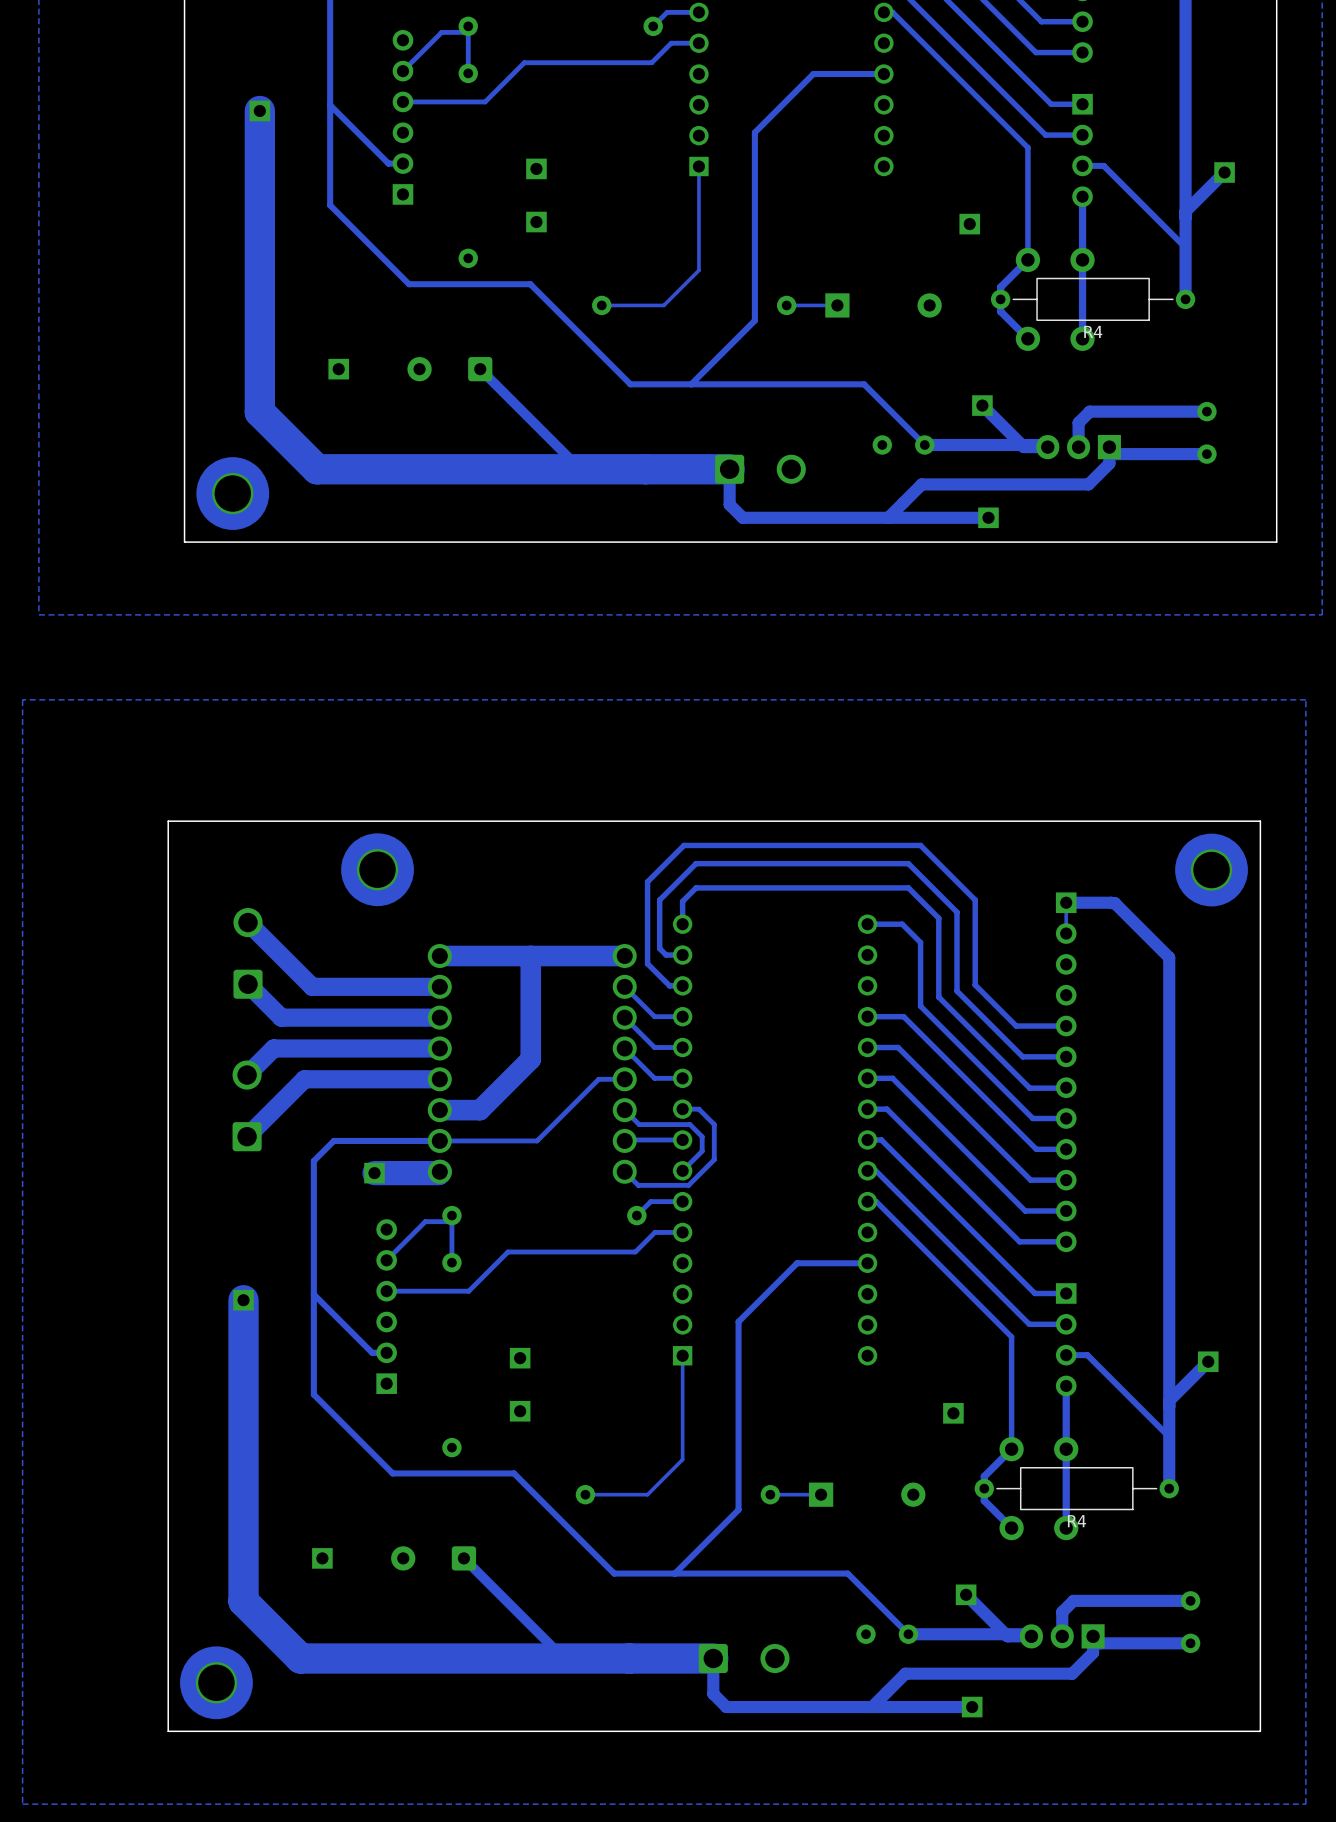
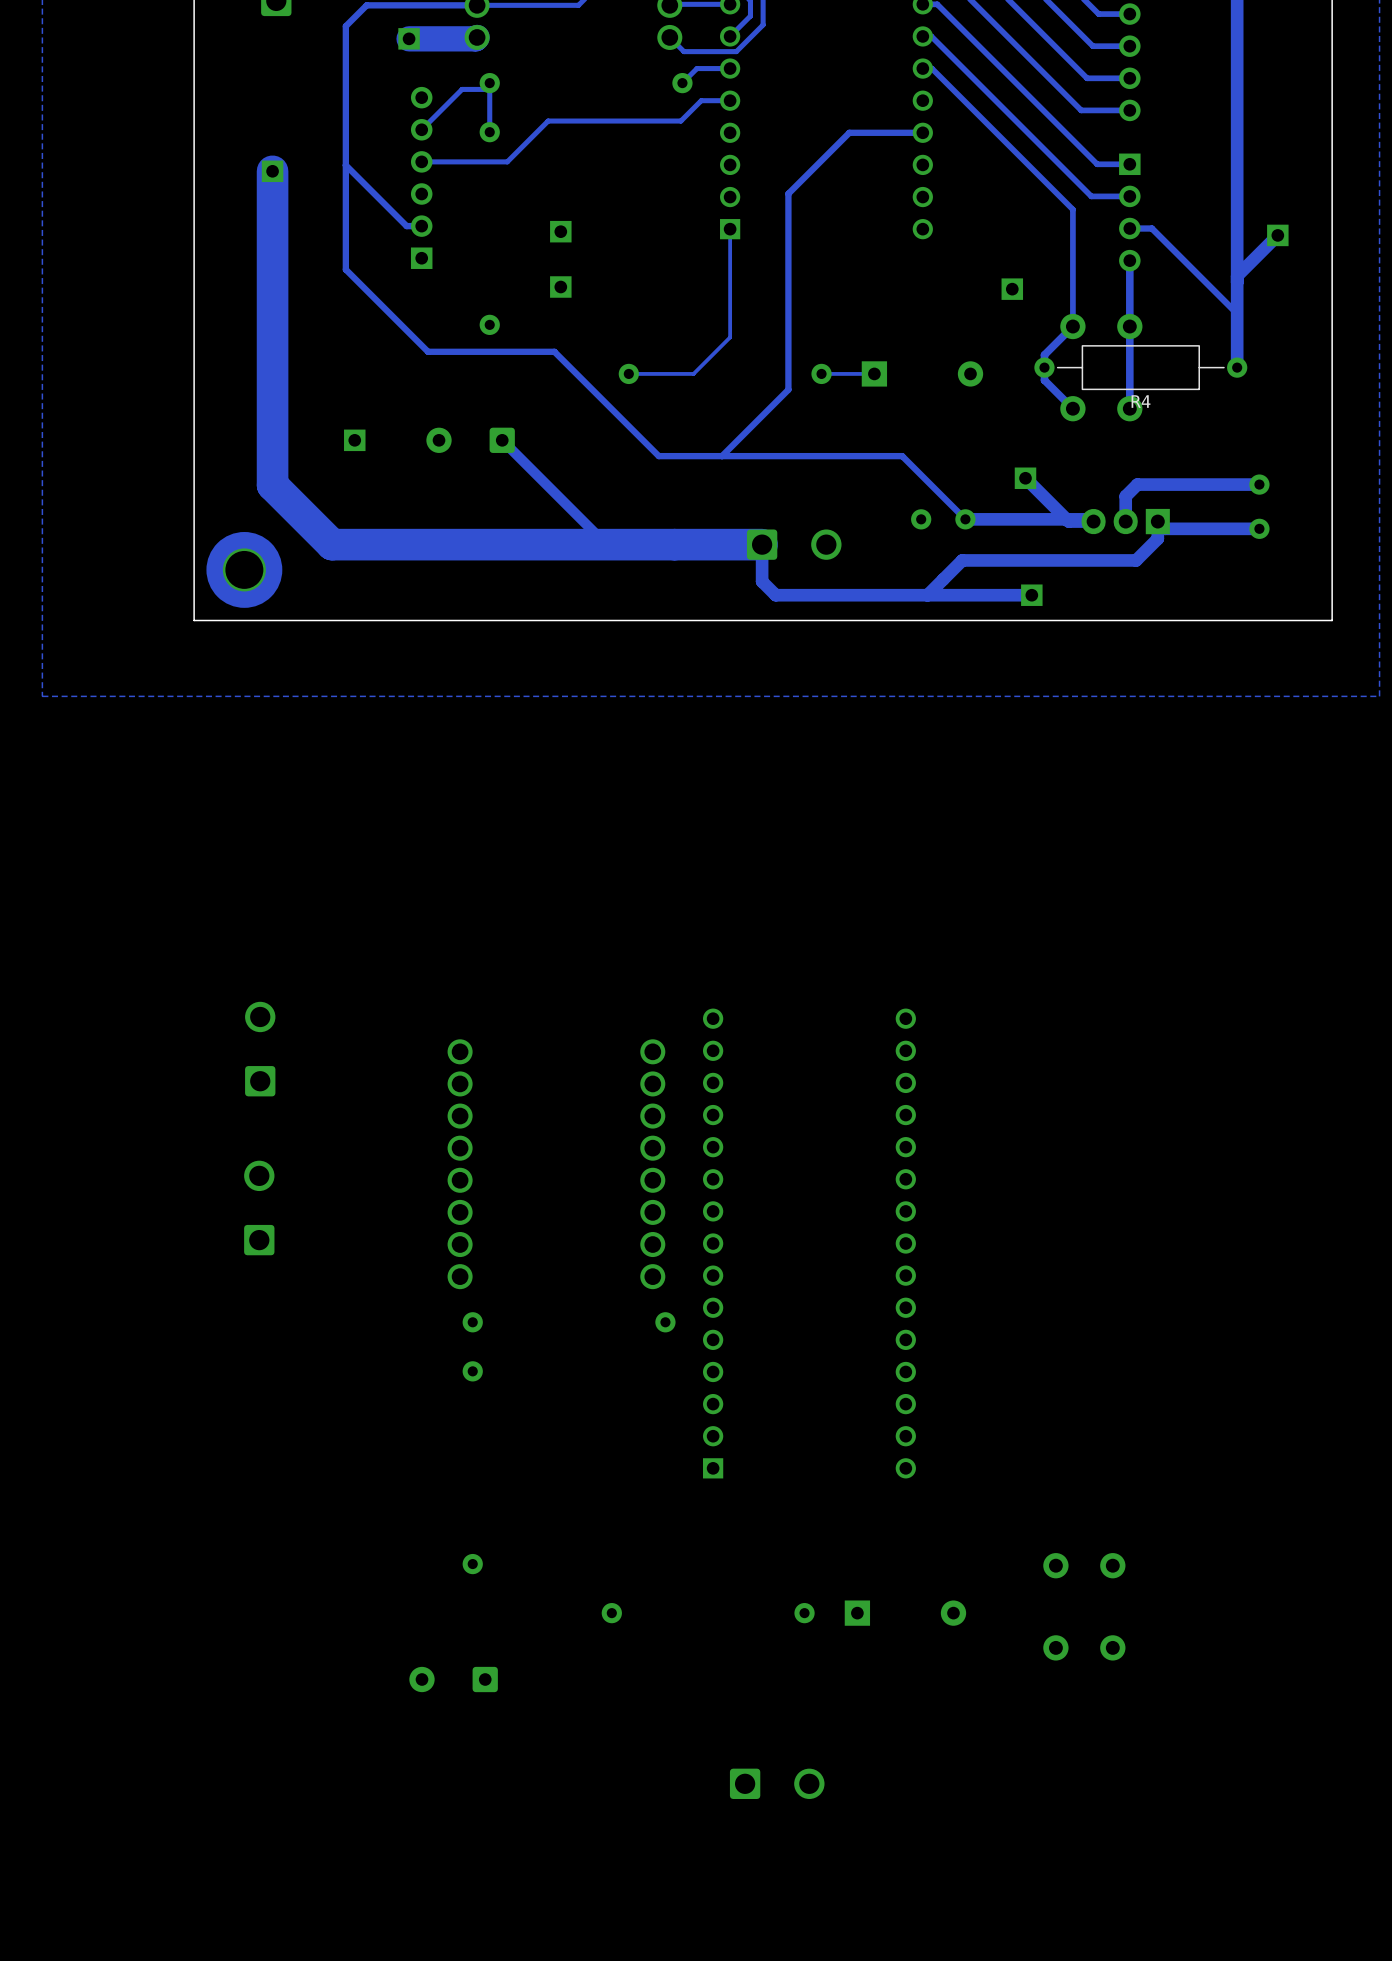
zone outline: (1305, 699) (22, 699) (22, 1804) (1305, 1804) (1305, 699) -> none
board edge: (1260, 821) (168, 821) (168, 1731) (1260, 1731) (1260, 821) -> none
part: (377, 869) -> none
part: (1211, 870) -> none
track: (248, 922) (312, 986) (439, 986) -> none
track: (682, 924) (682, 901) (696, 887) (908, 887) (938, 918) (938, 997) (1029, 1088) (1066, 1087) -> none
track: (867, 924) (902, 924) (920, 942) (920, 1006) (1032, 1118) (1066, 1118) -> none
track: (1066, 933) (1066, 902) (1114, 903) (1169, 957) (1169, 1488) (1169, 1436) (1087, 1355) (1066, 1355) -> none
track: (682, 955) (666, 955) (659, 948) (659, 900) (696, 863) (908, 863) (957, 912) (957, 991) (1022, 1056) (1066, 1056) -> none
track: (530, 956) (530, 1059) (479, 1110) (439, 1110) -> none
track: (624, 956) (439, 956) -> none
track: (248, 984) (281, 1017) (439, 1017) -> none
track: (682, 985) (669, 985) (647, 963) (647, 881) (683, 845) (920, 845) (975, 900) (975, 985) (1016, 1026) (1066, 1026) -> none
track: (624, 986) (654, 1016) (682, 1016) -> none
track: (867, 1016) (903, 1016) (1036, 1149) (1066, 1149) -> none
track: (624, 1017) (654, 1047) (682, 1047) -> none
track: (867, 1047) (898, 1047) (1030, 1180) (1066, 1180) -> none
track: (439, 1048) (273, 1048) (247, 1075) -> none
track: (624, 1048) (654, 1078) (682, 1078) -> none
part: (1066, 1072) -> none
track: (867, 1078) (892, 1078) (1025, 1210) (1066, 1210) -> none
track: (439, 1079) (304, 1079) (247, 1136) -> none
track: (624, 1079) (598, 1079) (537, 1140) (333, 1140) (313, 1160) (313, 1394) (392, 1473) (514, 1473) (614, 1573) (847, 1573) (908, 1634) (1029, 1634) (1031, 1636) (1007, 1636) (966, 1594) -> none
track: (682, 1109) (698, 1109) (714, 1124) (714, 1159) (688, 1185) (638, 1185) (624, 1171) -> none
track: (867, 1109) (886, 1109) (1019, 1241) (1066, 1241) -> none
track: (624, 1110) (639, 1124) (690, 1124) (702, 1136) (702, 1151) (682, 1170) -> none
track: (682, 1139) (624, 1140) -> none
track: (867, 1139) (881, 1139) (1034, 1293) (1066, 1293) -> none
track: (867, 1170) (875, 1170) (1029, 1324) (1066, 1324) -> none
track: (439, 1171) (374, 1173) -> none
part: (374, 1173) -> none
track: (682, 1201) (650, 1201) (636, 1215) -> none
track: (867, 1201) (876, 1201) (1011, 1336) (1011, 1449) (984, 1476) (984, 1500) (1011, 1528) -> none
track: (682, 1232) (654, 1232) (635, 1251) (508, 1251) (468, 1291) (386, 1291) -> none
track: (386, 1260) (425, 1221) (451, 1221) (451, 1262) -> none
track: (867, 1263) (797, 1263) (738, 1321) (738, 1509) (674, 1573) -> none
track: (313, 1294) (372, 1352) (386, 1352) -> none
track: (243, 1300) (243, 1601) (300, 1658) (713, 1658) (713, 1693) (726, 1707) (972, 1707) -> none
part: (243, 1300) -> none
part: (386, 1306) -> none
part: (1066, 1339) -> none
track: (682, 1355) (682, 1459) (647, 1494) (585, 1494) -> none
part: (520, 1358) -> none
track: (1208, 1361) (1169, 1400) -> none
part: (1208, 1361) -> none
track: (1066, 1385) (1066, 1528) -> none
part: (520, 1411) -> none
part: (953, 1413) -> none
R4: (1076, 1488) -> none
track: (821, 1494) (770, 1494) -> none
part: (322, 1558) -> none
track: (463, 1558) (564, 1658) (629, 1658) -> none
part: (966, 1594) -> none
track: (1190, 1600) (1073, 1600) (1062, 1612) (1062, 1636) -> none
part: (1190, 1622) -> none
part: (887, 1634) -> none
part: (1062, 1636) -> none
track: (1190, 1643) (1100, 1643) (1093, 1636) (1093, 1652) (1072, 1673) (905, 1673) (872, 1707) -> none
part: (216, 1682) -> none
part: (972, 1707) -> none

